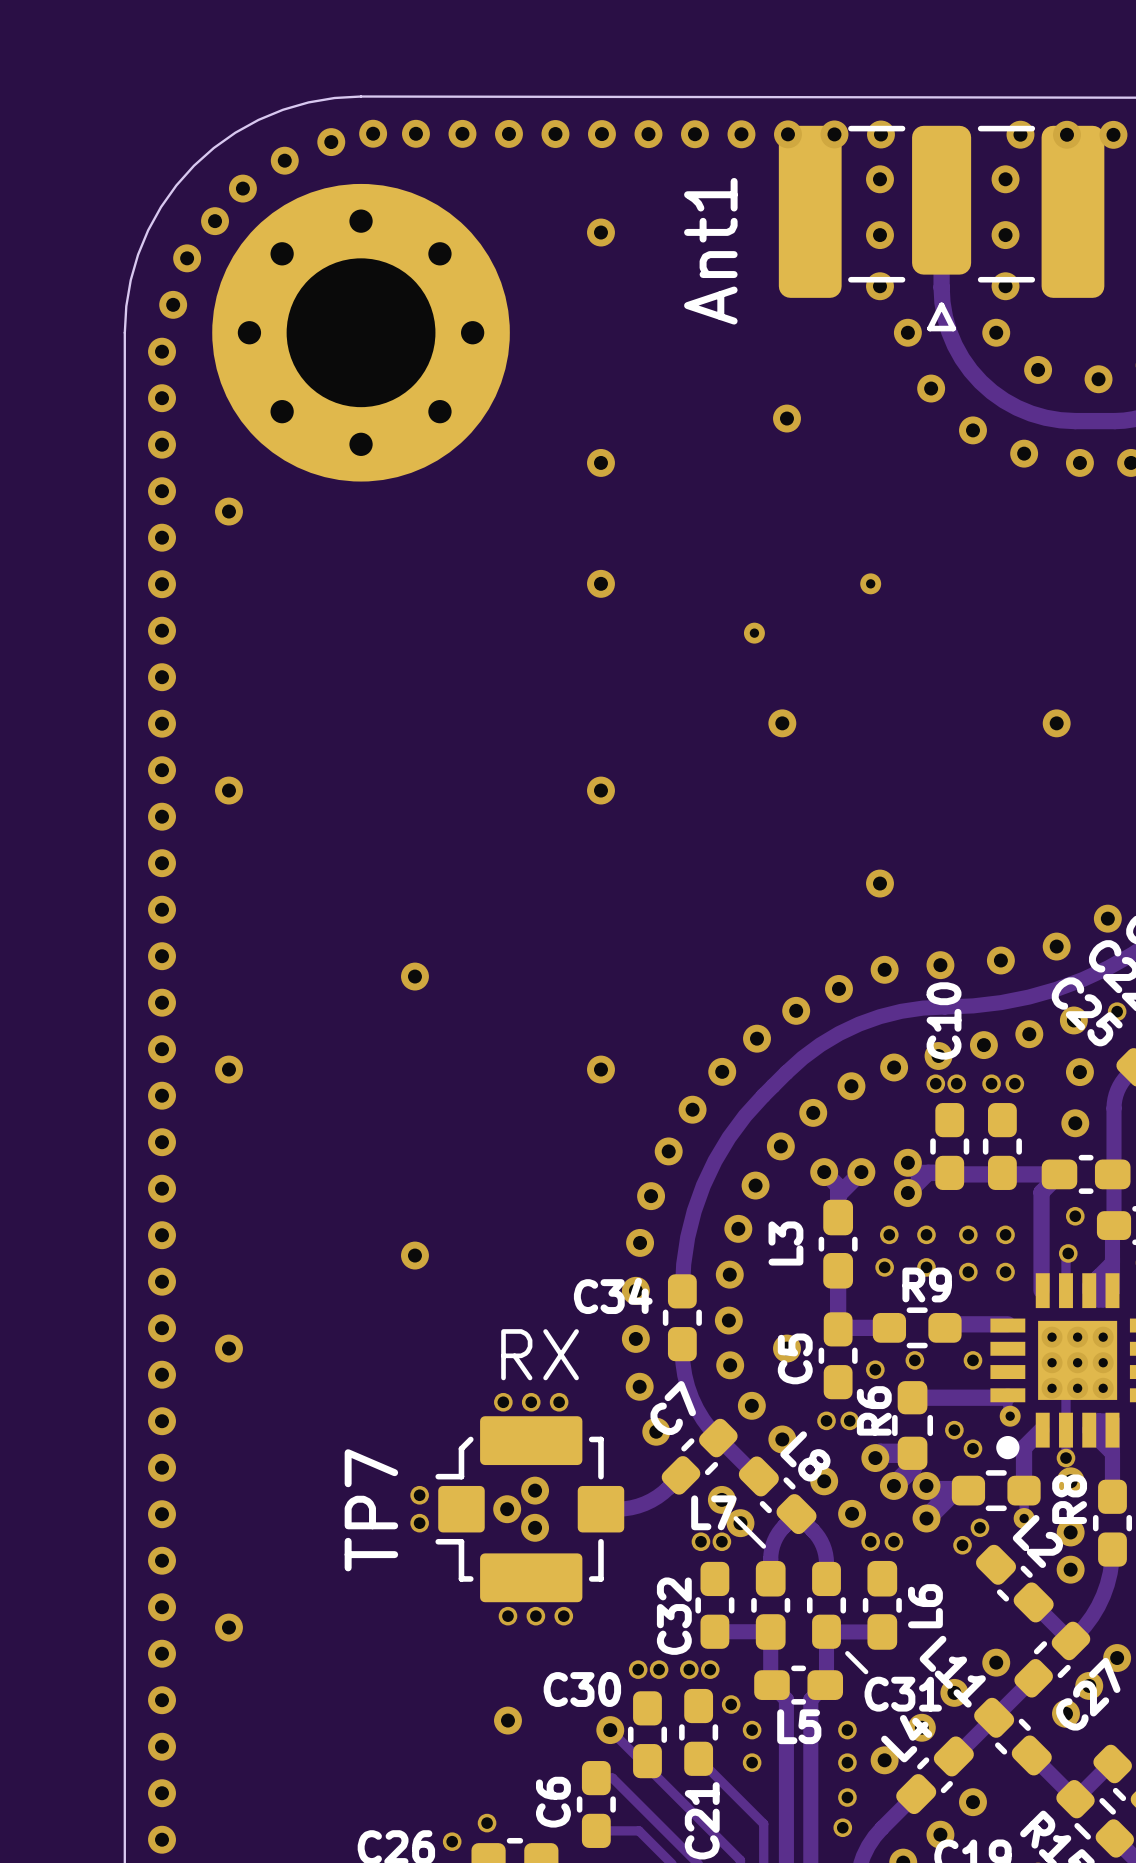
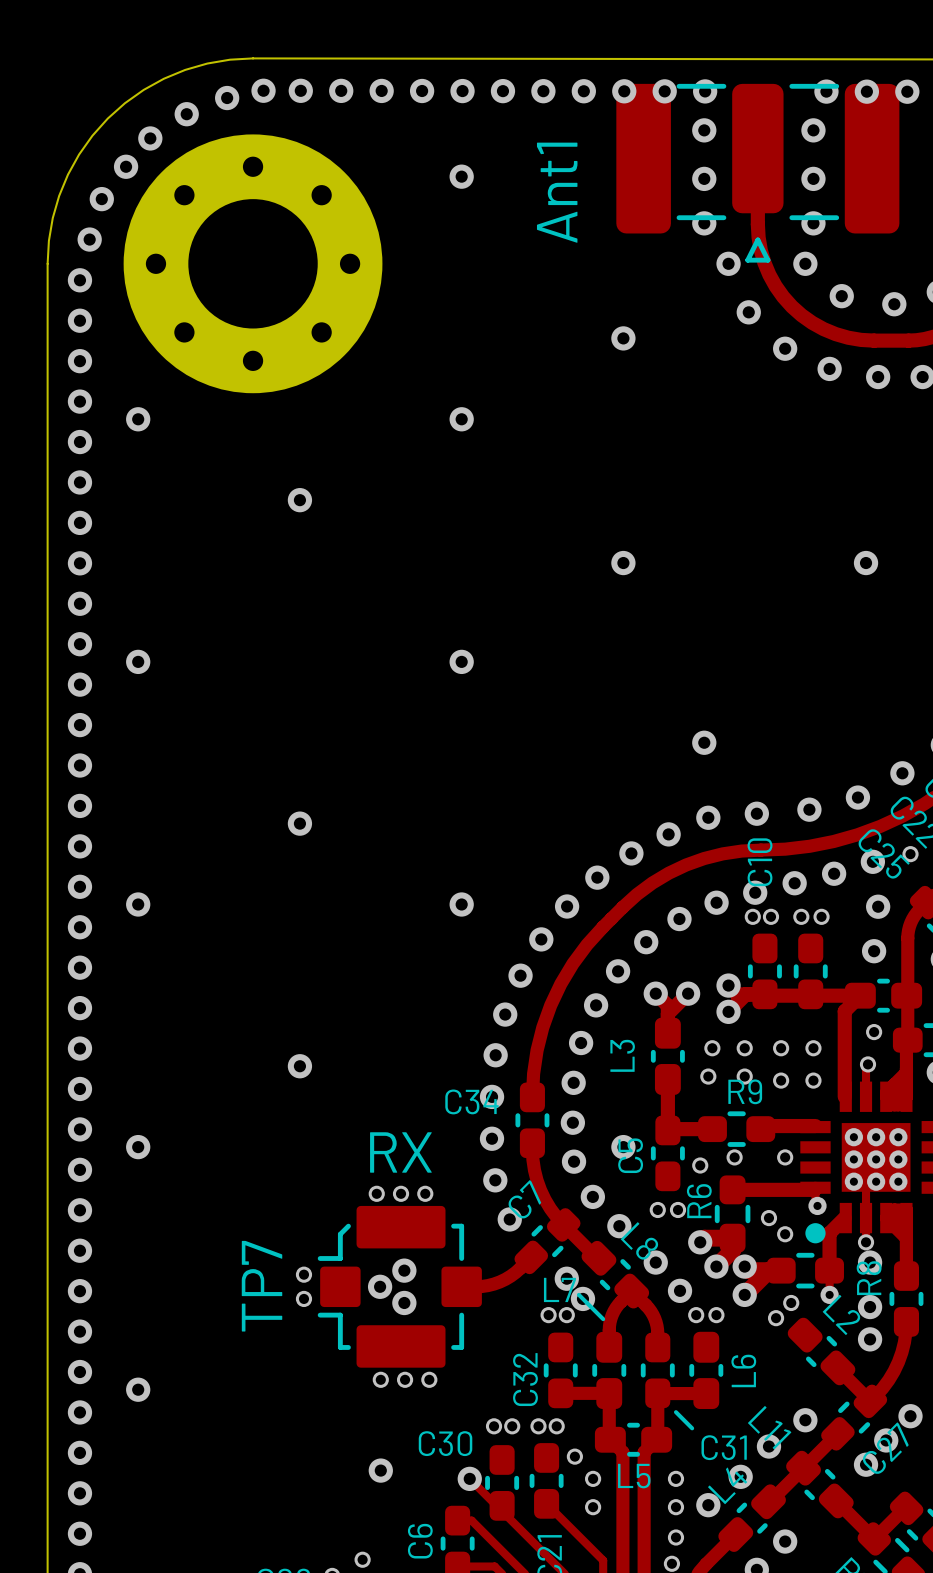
via: (600, 462) -> none
via: none -> (461, 419)
via: (600, 583) -> none
via: (870, 583) -> none
via: none -> (299, 500)
via: (754, 633) -> none
via position: (782, 723) -> (623, 563)
via position: (1056, 723) -> (866, 563)

